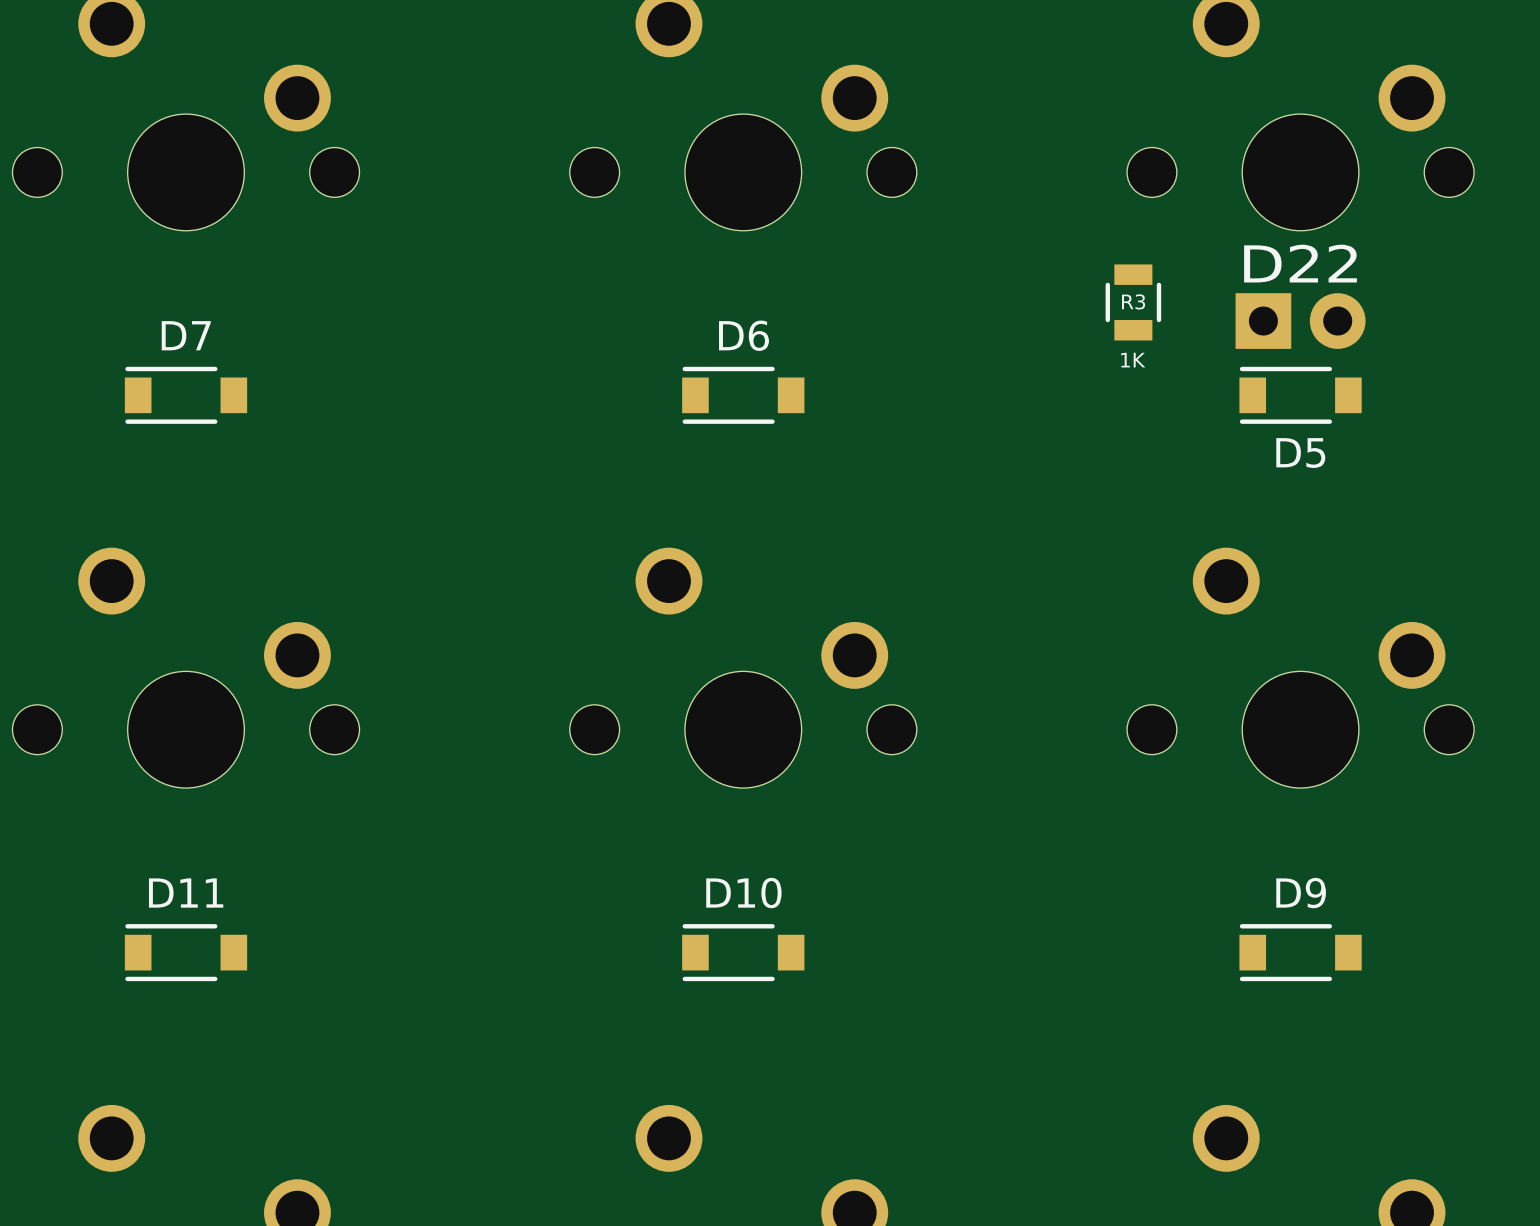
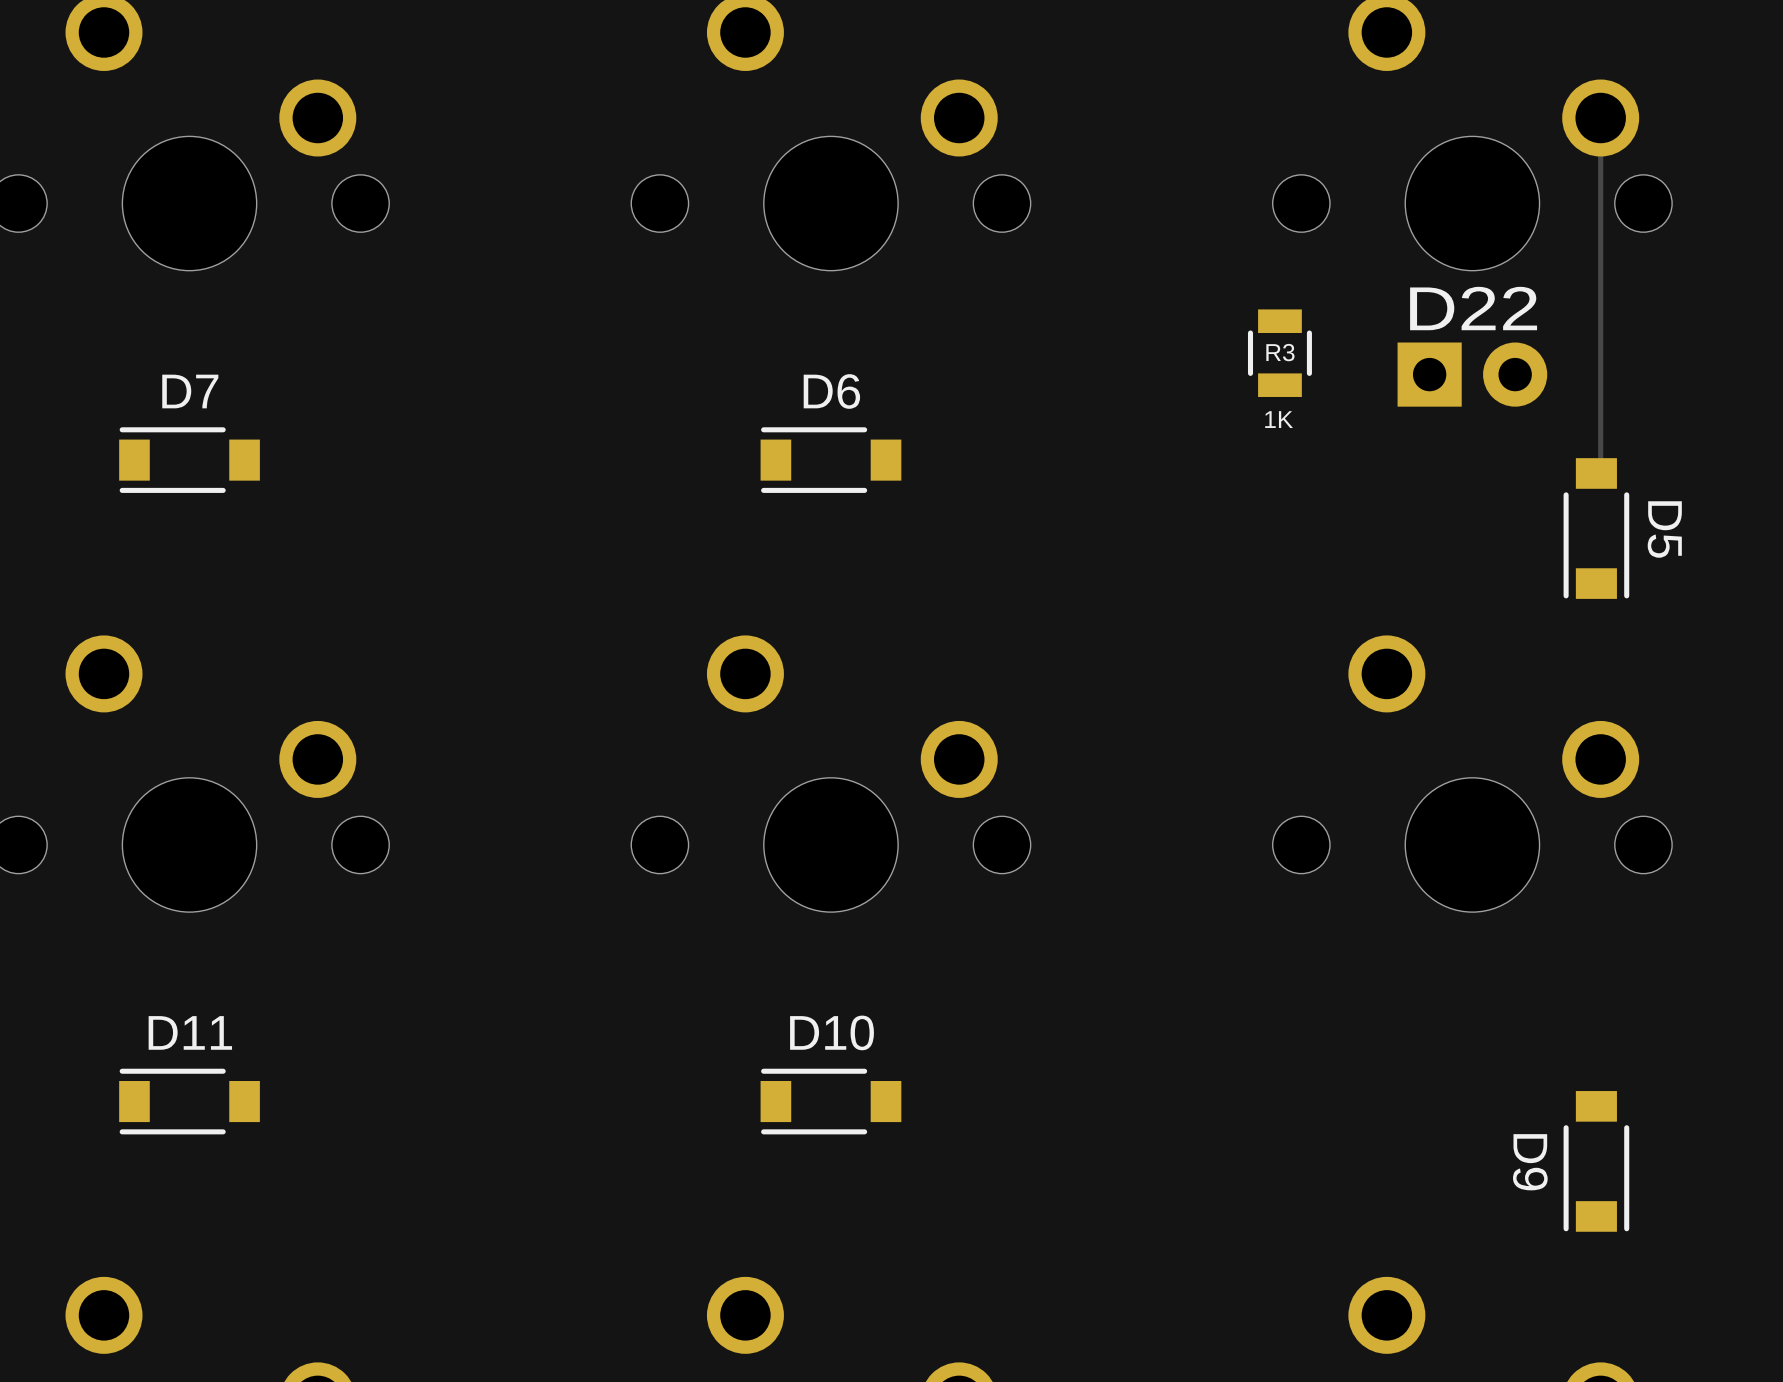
track: none -> (1600, 118) (1600, 469) (1596, 473)
D5 rotation: 0° (1300, 395) -> 90° counterclockwise (1596, 528)
D5 position: (1300, 395) -> (1596, 528)
D9 rotation: 0° (1300, 952) -> 90° counterclockwise (1596, 1161)
D9 position: (1300, 952) -> (1596, 1161)

